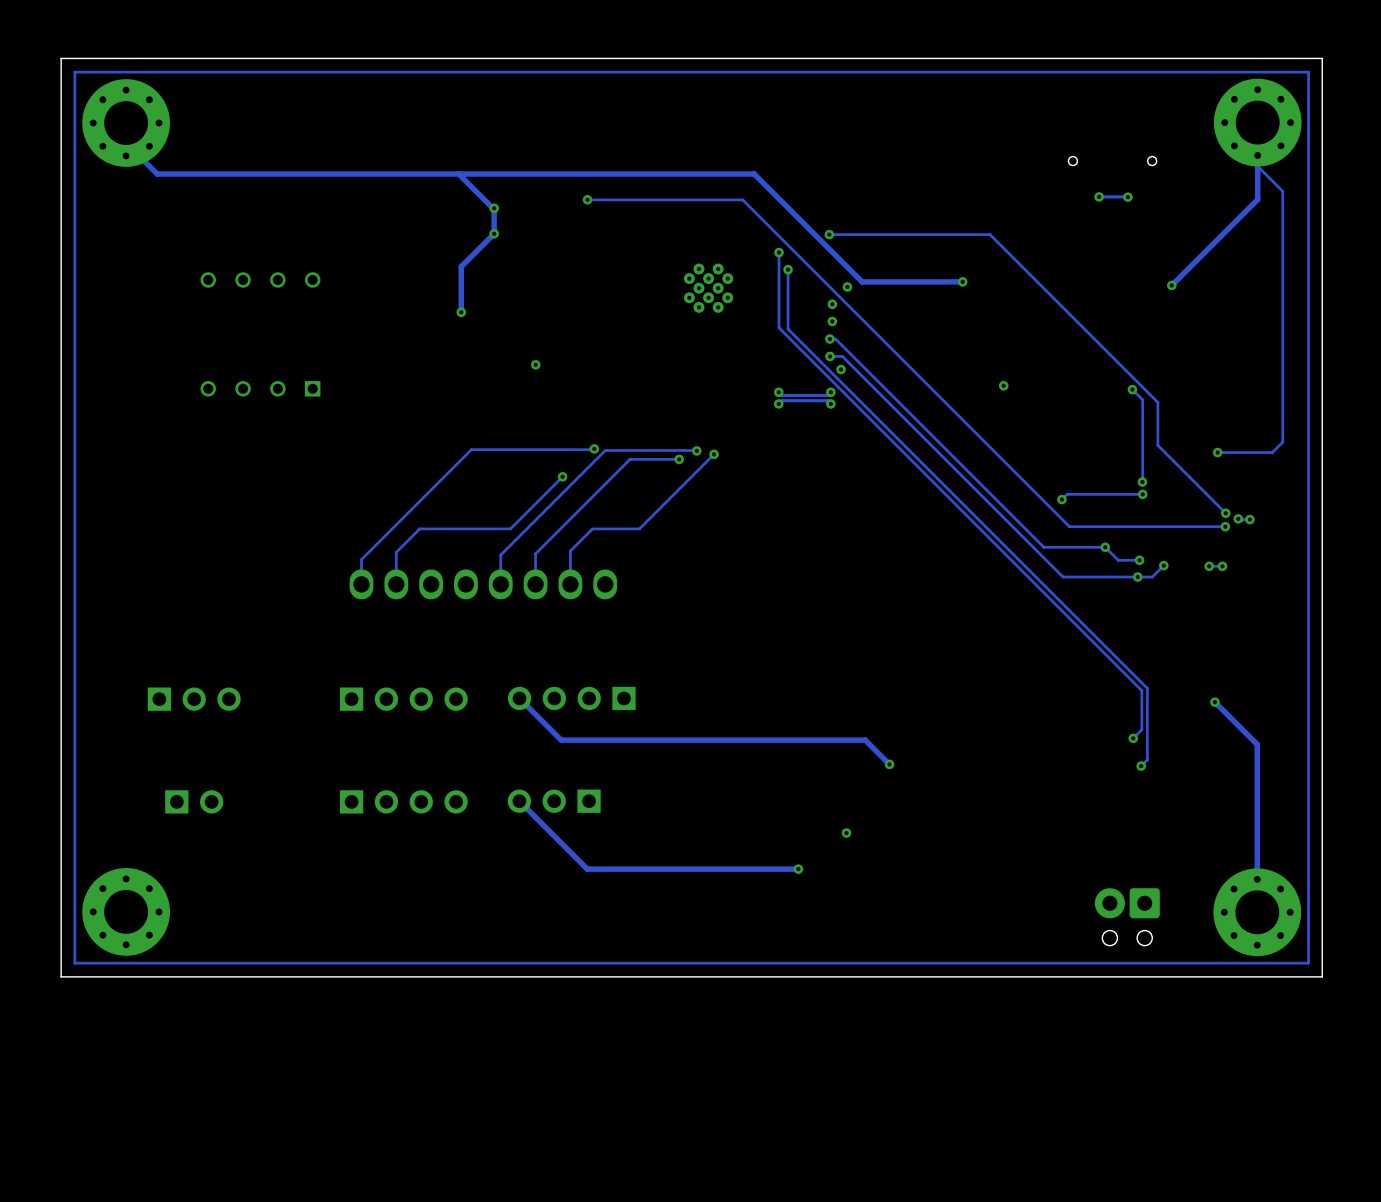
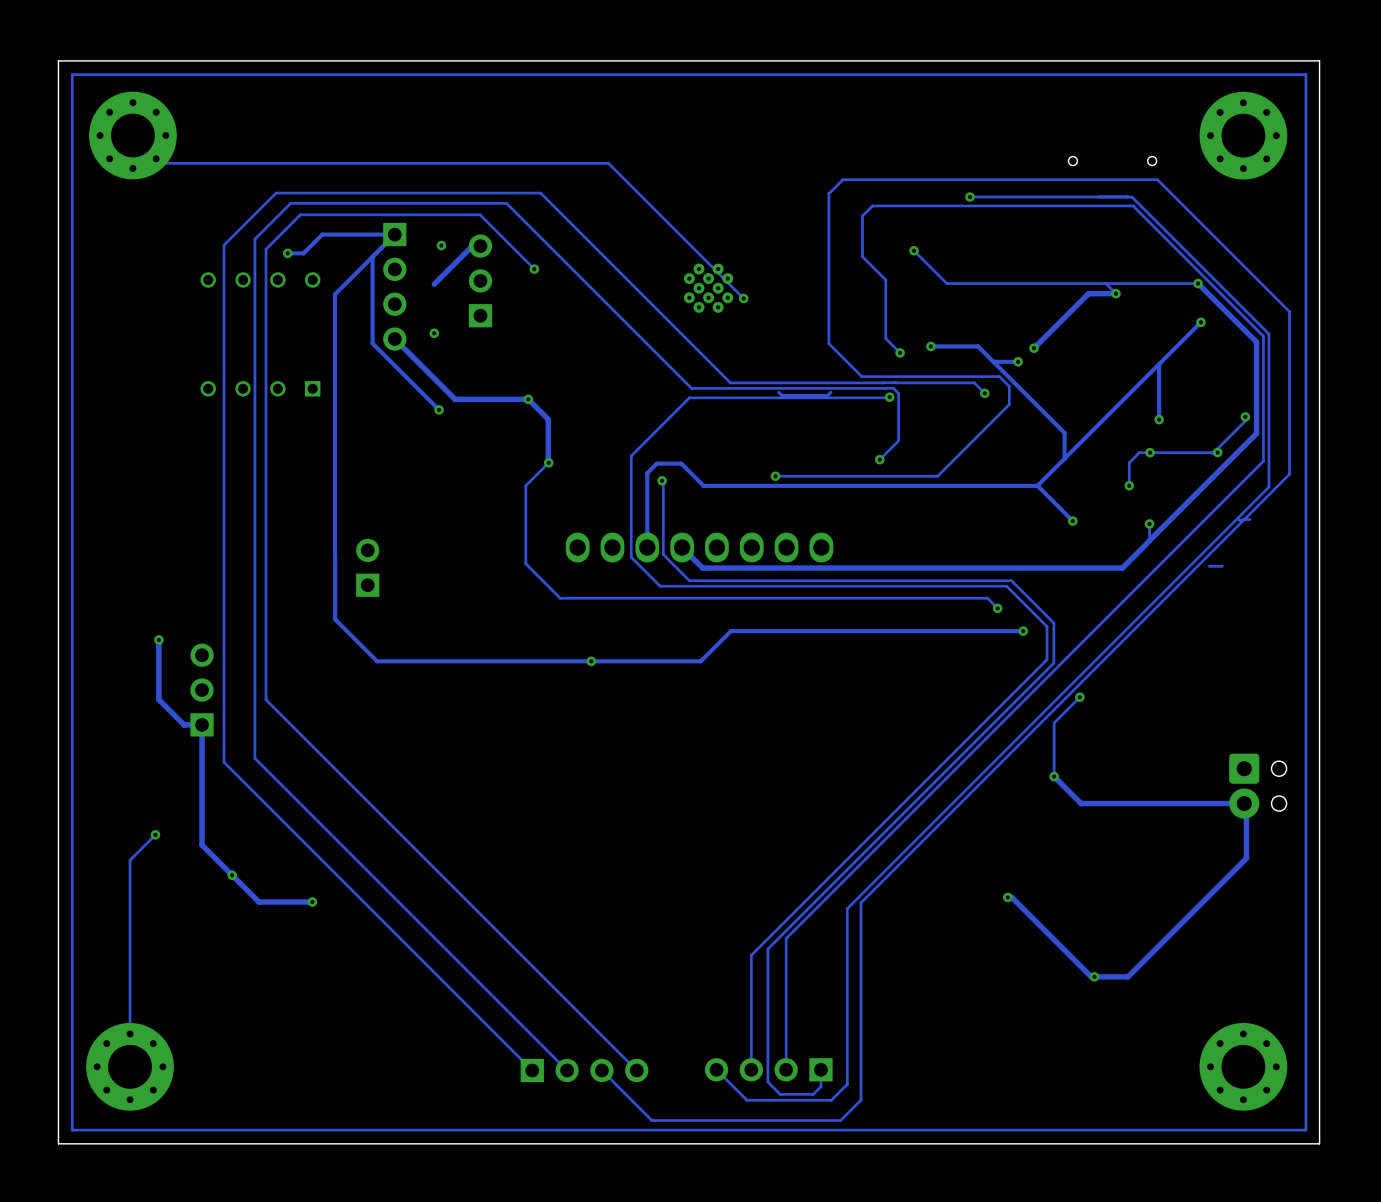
board edge: (1322, 58) (61, 58) (61, 976) (1322, 976) (1322, 58) -> (1319, 60) (1319, 1143) (58, 1143) (58, 60) (1319, 60)
track: (1308, 72) (74, 72) (74, 963) (1308, 963) (1308, 72) -> (1305, 74) (1305, 1130) (72, 1130) (72, 74) (1305, 74)
track: (1257, 122) (1257, 166) (1282, 191) (1282, 442) (1272, 452) (1217, 452) -> none
part position: (1257, 122) -> (1243, 135)
track: (126, 123) (126, 142) (157, 174) (754, 174) (862, 281) (962, 281) -> none
part position: (126, 123) -> (132, 135)
track: none -> (132, 135) (160, 163) (608, 163) (743, 298)
track: (1257, 155) (1257, 199) (1171, 285) -> none
track: (458, 174) (494, 209) (494, 233) (461, 266) (461, 312) -> none
via: (1099, 196) -> none
track: none -> (969, 197) (1131, 197) (1268, 334) (1268, 487) (847, 908) (847, 1084) (831, 1100) (746, 1100) (716, 1069)
via: none -> (969, 197)
via: (1127, 197) -> none
track: (587, 199) (742, 199) (1069, 526) (1225, 526) -> none
via: (587, 199) -> none
via: (494, 208) -> none
via: (494, 233) -> none
track: (829, 234) (990, 234) (1157, 402) (1157, 445) (1225, 513) -> none
via: (829, 234) -> none
via: none -> (441, 245)
track: none -> (480, 246) (472, 246) (434, 284)
track: none -> (914, 250) (946, 283) (1198, 283) (1256, 342) (1256, 433) (1148, 541)
via: none -> (914, 250)
track: (779, 252) (779, 327) (1141, 690) (1141, 729) (1133, 738) -> none
via: (779, 252) -> none
track: none -> (287, 253) (303, 253) (322, 234) (394, 234) (335, 294) (335, 556)
via: none -> (287, 253)
track: none -> (372, 256) (372, 343) (439, 409)
track: none -> (534, 269) (480, 214) (300, 214) (266, 249) (266, 699) (636, 1070)
via: none -> (534, 269)
track: (788, 269) (788, 329) (1147, 688) (1147, 759) (1141, 766) -> none
via: (788, 269) -> none
part: none -> (480, 280)
via: (962, 281) -> none
track: none -> (1105, 283) (1115, 293) (1088, 293) (1033, 348)
via: none -> (1198, 283)
via: (1171, 285) -> none
part: none -> (394, 286)
via: (847, 286) -> none
via: none -> (1115, 293)
via: none -> (743, 298)
via: (832, 304) -> none
via position: (461, 312) -> (434, 333)
via: (832, 321) -> none
track: none -> (1200, 322) (1037, 485)
via: none -> (1200, 322)
track: none -> (394, 339) (455, 399) (528, 399) (548, 419) (548, 462) (525, 485) (525, 563) (560, 598) (987, 598) (997, 608)
track: (829, 339) (835, 339) (1043, 547) (1105, 547) (1118, 560) (1139, 560) -> none
via: (829, 339) -> none
track: none -> (1263, 339) (1263, 336) (1133, 205) (872, 205) (862, 215) (862, 256) (885, 279) (885, 338) (900, 352)
track: none -> (1263, 339) (1263, 461) (1059, 665)
track: none -> (930, 346) (978, 346) (1064, 432) (1064, 458)
via: none -> (930, 346)
via: none -> (1033, 348)
via: none -> (900, 352)
track: (830, 356) (842, 356) (1063, 577) (1152, 577) (1163, 565) -> none
via: (830, 356) -> none
track: none -> (1018, 361) (993, 361)
via: none -> (1018, 361)
via position: (535, 364) -> (528, 399)
track: none -> (1159, 364) (1159, 419)
via: (841, 369) -> none
track: none -> (883, 382) (730, 382) (540, 193) (276, 193) (224, 245) (224, 762) (532, 1070)
track: none -> (895, 382) (883, 382)
track: none -> (895, 382) (974, 382) (984, 393)
via: (1003, 385) -> none
track: none -> (885, 388) (893, 388) (898, 393) (898, 440) (879, 459)
track: none -> (885, 388) (691, 388) (506, 203) (290, 203) (254, 239) (254, 758) (567, 1070)
track: (1132, 389) (1142, 399) (1142, 482) -> none
via: (1132, 389) -> none
via: (778, 392) -> none
via: (830, 392) -> none
via: none -> (984, 393)
track: none -> (889, 397) (689, 397) (631, 455) (631, 557) (660, 586) (1006, 586) (1047, 626) (1047, 659) (751, 955) (751, 1069)
via: none -> (889, 397)
via: (778, 403) -> none
track: (830, 403) (827, 400) (781, 400) (778, 403) -> none
via: (830, 403) -> none
via: none -> (439, 409)
track: none -> (1245, 416) (1245, 420) (1212, 453) (1139, 452) (1129, 462) (1129, 485)
via: none -> (1245, 416)
via: none -> (1159, 419)
track: (594, 448) (471, 449) (361, 559) (361, 584) -> none
via: (594, 448) -> none
track: (696, 450) (605, 450) (500, 555) (500, 584) -> none
via: (696, 450) -> none
via: none -> (1150, 452)
track: (714, 454) (639, 528) (592, 528) -> none
via: (714, 454) -> none
track: (679, 459) (630, 459) (535, 553) (535, 584) -> none
via: (679, 459) -> none
via: none -> (879, 459)
track: (562, 476) (510, 528) (419, 528) (396, 552) (396, 584) -> none
via position: (562, 476) -> (548, 462)
track: none -> (775, 476) (937, 476) (1009, 404) (1009, 386) (999, 376) (861, 376) (828, 343) (828, 193) (842, 179) (1157, 179) (1289, 311) (1289, 474) (861, 902) (861, 1100) (840, 1120) (651, 1120) (601, 1070)
via: none -> (775, 476)
track: none -> (662, 480) (663, 554) (689, 580) (1011, 580) (1053, 623) (1053, 663) (767, 949) (767, 1082) (780, 1094) (813, 1094) (820, 1086) (820, 1069)
via: none -> (662, 480)
via: (1142, 482) -> none
via: none -> (1129, 485)
track: (1142, 494) (1067, 494) (1061, 499) -> none
via: (1142, 494) -> none
via: (1061, 499) -> none
via: (1225, 513) -> none
via: (1238, 518) -> none
via: (1249, 519) -> none
track: none -> (1072, 521) (1037, 485) (703, 485) (681, 463) (656, 463) (647, 473) (647, 547)
via: none -> (1072, 521)
track: none -> (1149, 523) (1149, 539)
via: none -> (1149, 523)
via: (1225, 526) -> none
track: (592, 529) (570, 551) (570, 584) -> none
track: none -> (1146, 543) (1122, 568) (702, 568) (682, 547)
via: (1105, 547) -> none
track: none -> (335, 556) (335, 619) (377, 661) (700, 661) (730, 631) (1023, 631)
via: (1139, 560) -> none
via: (1163, 565) -> none
via: (1209, 566) -> none
via: (1222, 566) -> none
via: (1137, 577) -> none
part position: (483, 584) -> (699, 547)
via: none -> (997, 608)
via: none -> (1023, 631)
track: none -> (158, 639) (158, 699) (184, 724) (202, 724) (202, 845) (258, 902) (312, 902)
via: none -> (158, 639)
via: none -> (591, 661)
track: none -> (1059, 665) (786, 938) (786, 1069)
track: none -> (1079, 697) (1054, 723) (1054, 776) (1081, 803) (1244, 803) (1246, 805) (1246, 858) (1128, 976) (1091, 976) (1011, 897) (1007, 897)
via: none -> (1079, 697)
track: (519, 698) (561, 740) (865, 740) (889, 764) -> none
part: (571, 698) -> none
part rotation: 0° (194, 699) -> 90° counterclockwise (202, 690)
part: (403, 699) -> none
track: (1214, 702) (1257, 744) (1257, 912) -> none
via: (1214, 702) -> none
via: (1133, 738) -> none
via: (889, 764) -> none
via: (1141, 766) -> none
via: none -> (1054, 776)
part rotation: 0° (194, 801) -> 90° counterclockwise (367, 567)
part position: (194, 801) -> (367, 567)
part: (403, 801) -> none
track: (519, 801) (587, 869) (798, 869) -> none
part: (554, 801) -> none
via: (846, 833) -> none
track: none -> (155, 834) (130, 860) (130, 1066)
via: none -> (155, 834)
via: (798, 869) -> none
via: none -> (232, 875)
via: none -> (1007, 897)
via: none -> (312, 902)
part position: (126, 911) -> (130, 1066)
part position: (1257, 912) -> (1243, 1066)
part rotation: 0° (1127, 916) -> 90° counterclockwise (1257, 786)
part position: (1127, 916) -> (1257, 786)
via: none -> (1094, 976)
part: none -> (768, 1069)
part: none -> (584, 1070)

